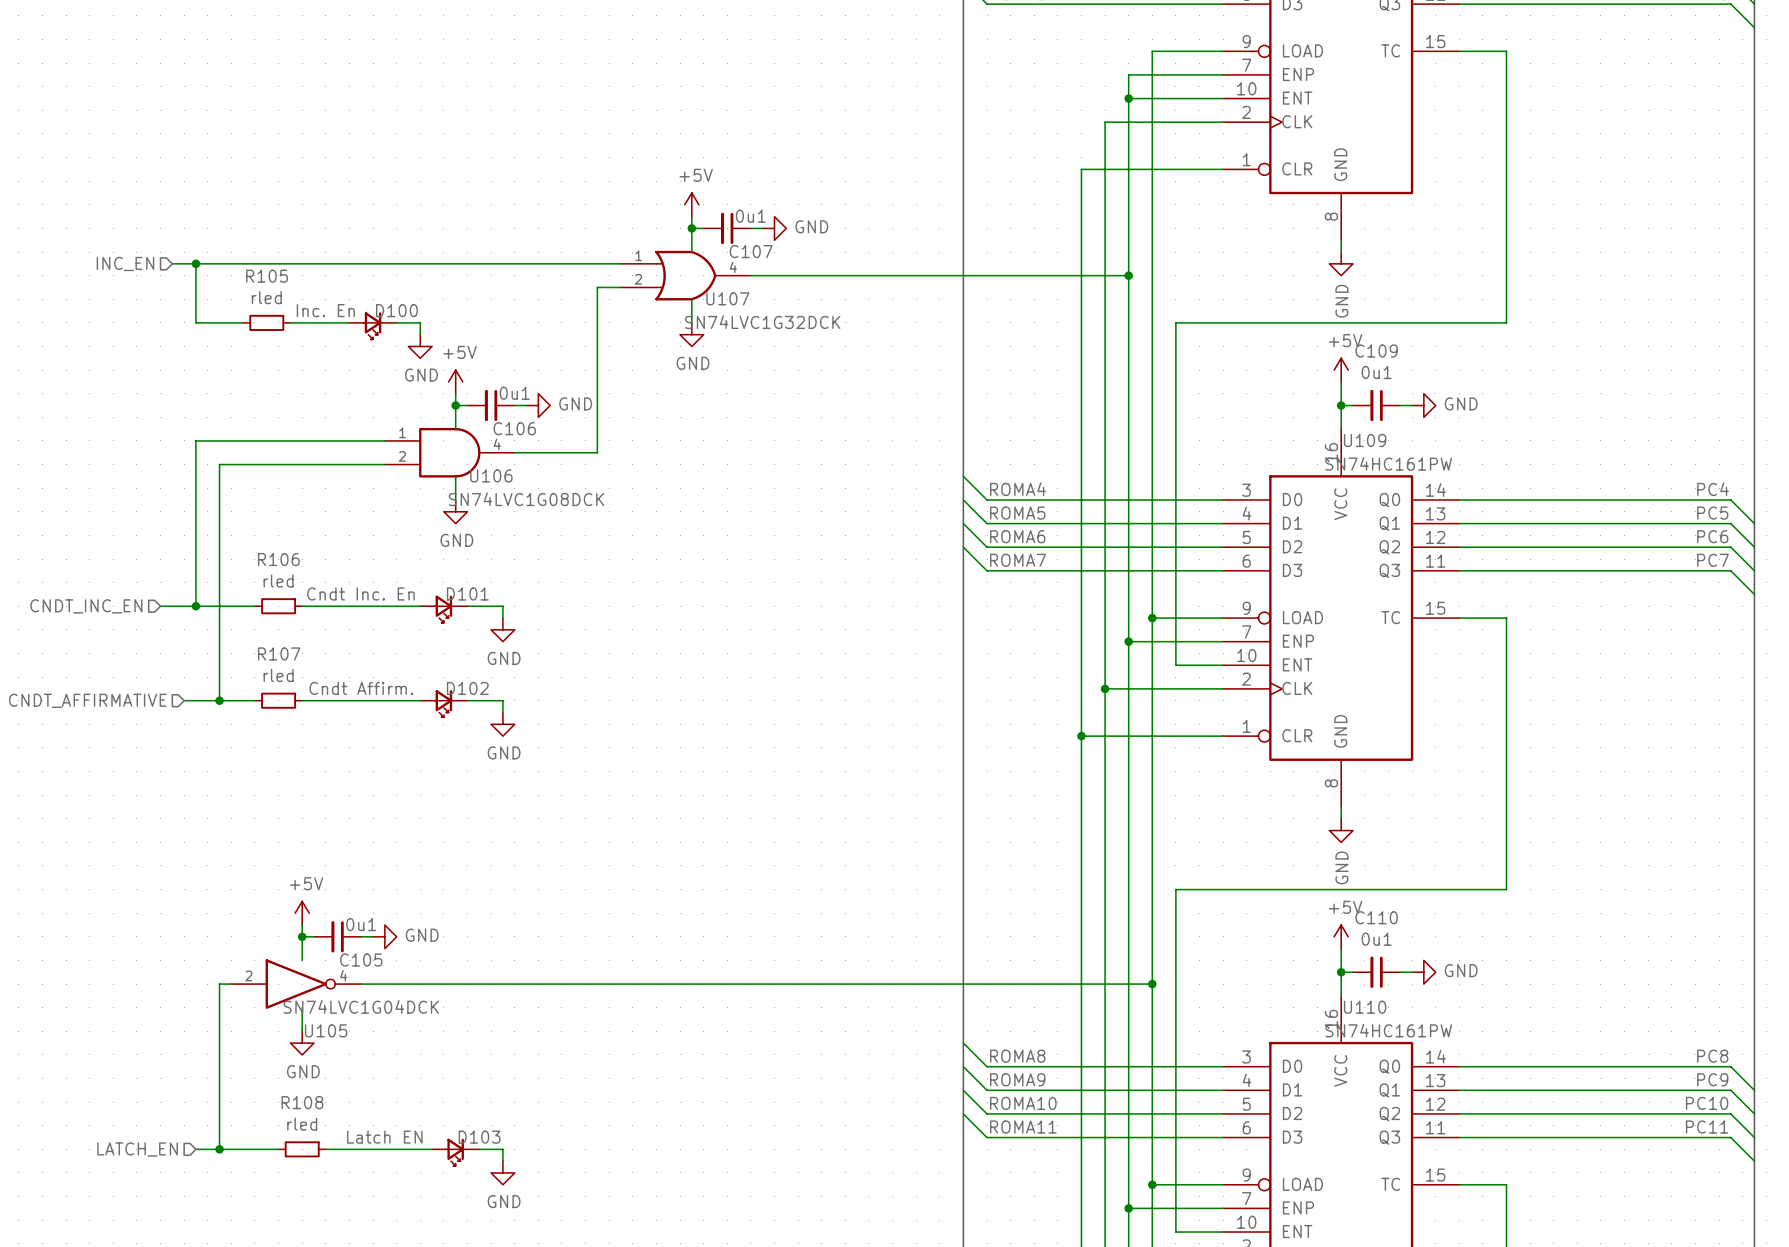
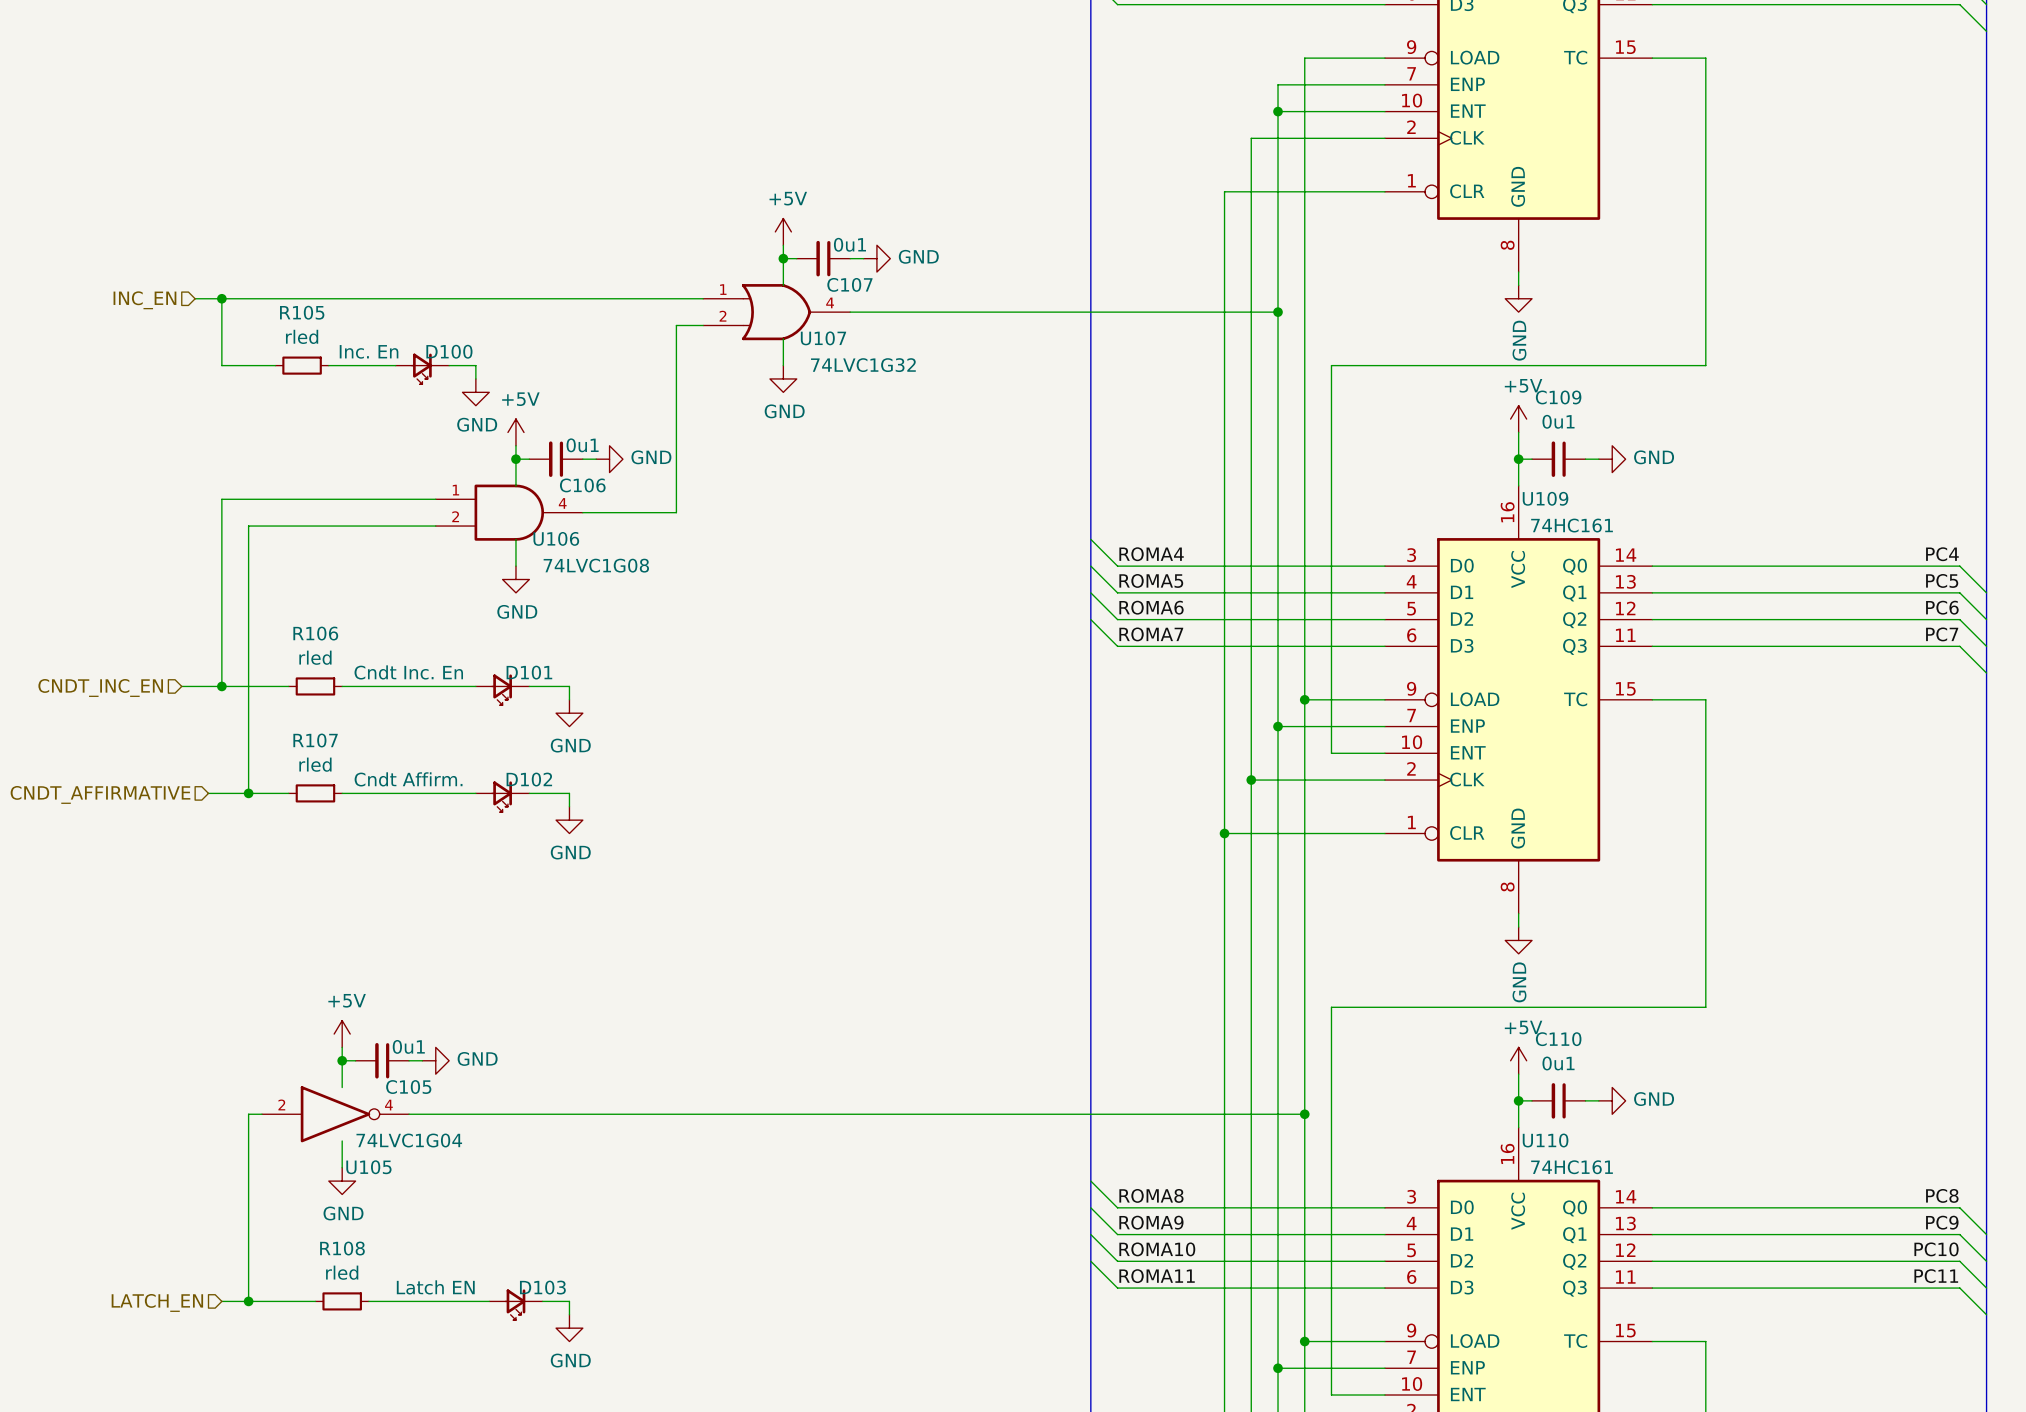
U107 value: SN74LVC1G32DCK (762, 322) -> 74LVC1G32 (863, 365)
U109 value: SN74HC161PW (1388, 463) -> 74HC161 (1572, 525)
U106 value: SN74LVC1G08DCK (526, 499) -> 74LVC1G08 (596, 565)
U105 value: SN74LVC1G04DCK (361, 1006) -> 74LVC1G04 (409, 1140)
U110 value: SN74HC161PW (1388, 1030) -> 74HC161 (1572, 1167)

